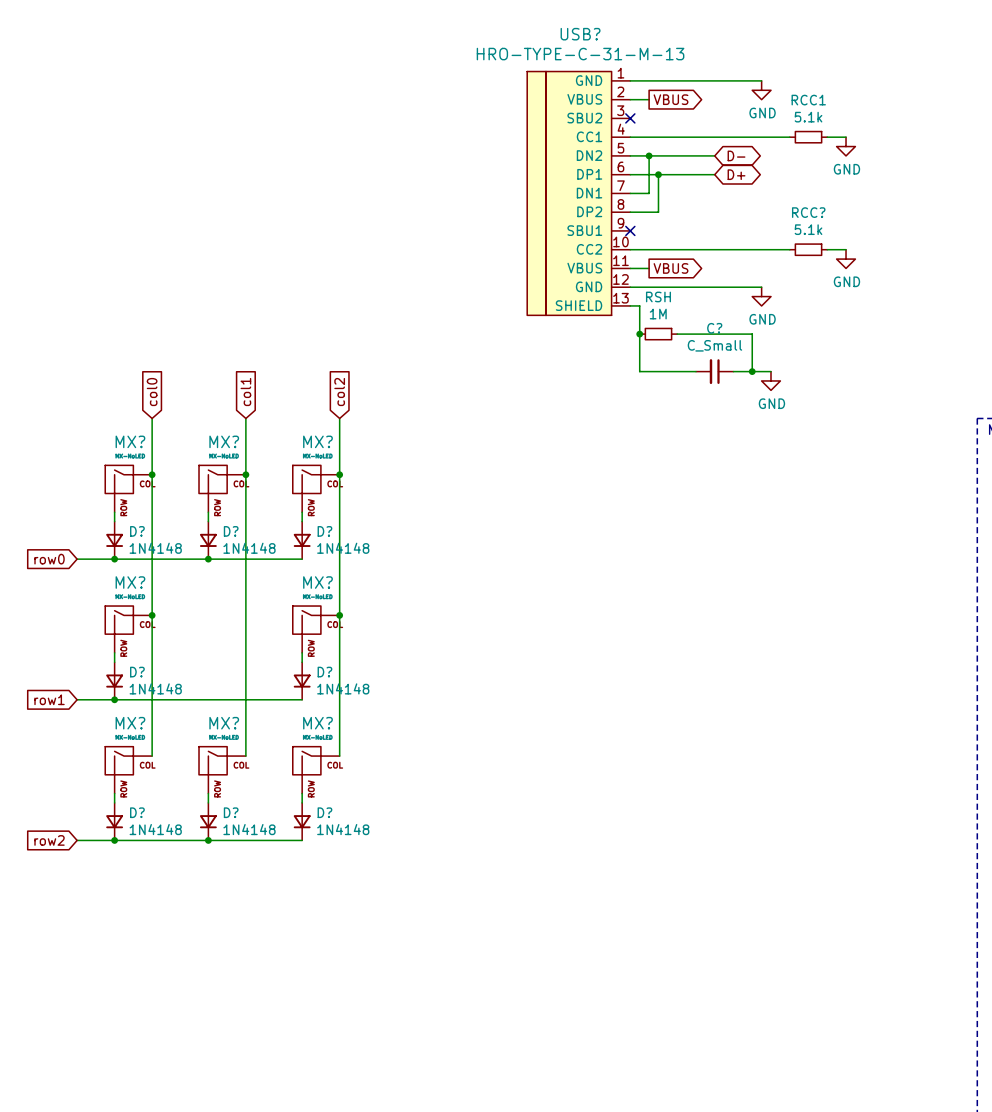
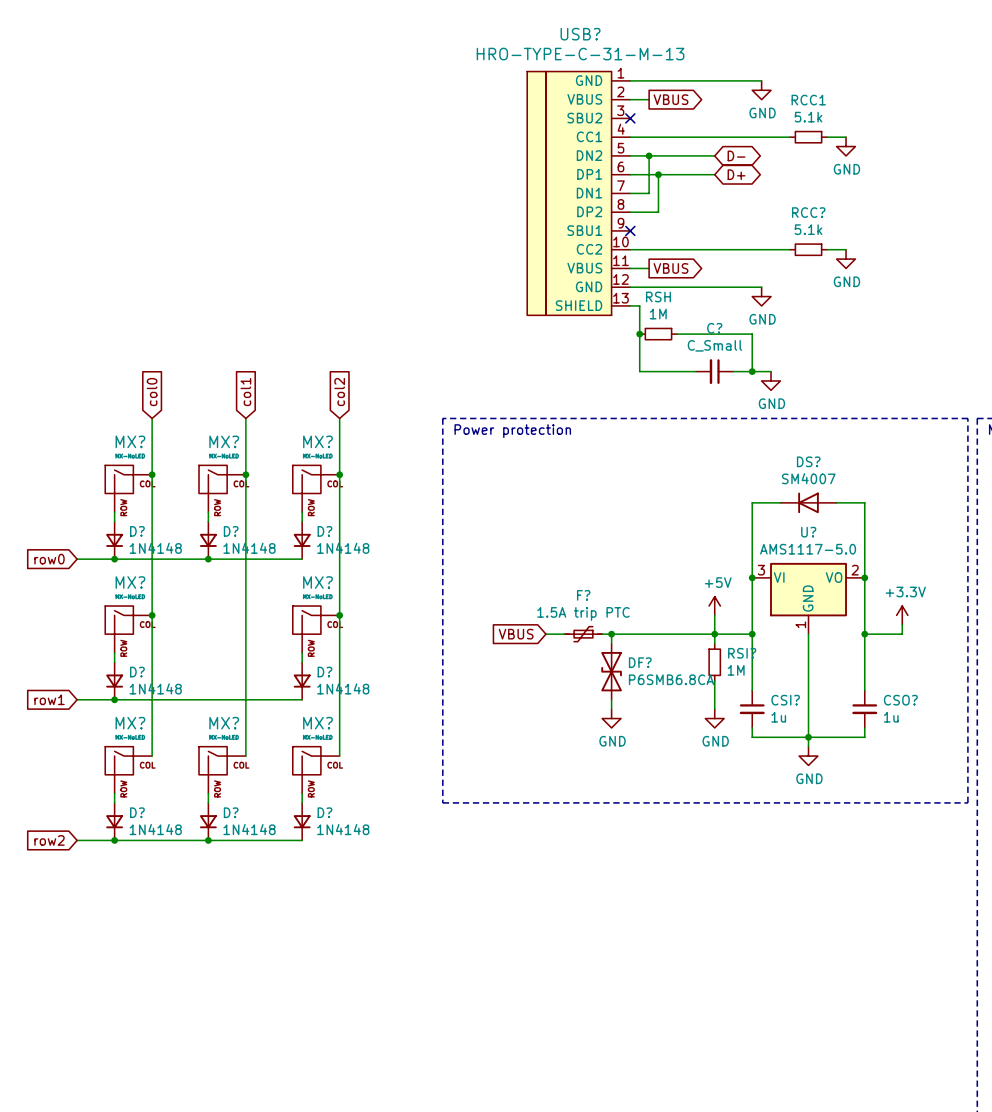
line: none -> (442, 418) (442, 802) (967, 802) (967, 418) (442, 418)
text: none -> Power protection (512, 431)
wire: none -> (780, 502) (752, 502) (752, 690)
DS?: none -> SM4007 (808, 502)
wire: none -> (836, 502) (864, 502) (864, 690)
junction: none -> (752, 577)
junction: none -> (864, 577)
U?: none -> AMS1117-5.0 (808, 598)
power symbol: none -> +5V (714, 606)
wire: none -> (714, 615) (714, 643)
power symbol: none -> +3.3V (902, 615)
wire: none -> (902, 624) (902, 634) (864, 634)
global label: none -> VBUS (516, 634)
wire: none -> (545, 634) (564, 634)
F?: none -> 1.5A trip PTC (583, 634)
wire: none -> (602, 634) (752, 634)
wire: none -> (611, 634) (611, 643)
junction: none -> (611, 634)
junction: none -> (714, 634)
junction: none -> (752, 634)
wire: none -> (808, 634) (808, 746)
junction: none -> (864, 634)
RSI?: none -> 1M (714, 662)
DF?: none -> P6SMB6.8CA (611, 671)
wire: none -> (714, 681) (714, 709)
wire: none -> (611, 699) (611, 709)
CSI?: none -> 1u (752, 709)
CSO?: none -> 1u (864, 709)
power symbol: none -> GND (611, 718)
power symbol: none -> GND (714, 718)
wire: none -> (752, 727) (752, 737) (864, 737) (864, 727)
junction: none -> (808, 737)
power symbol: none -> GND (808, 756)

